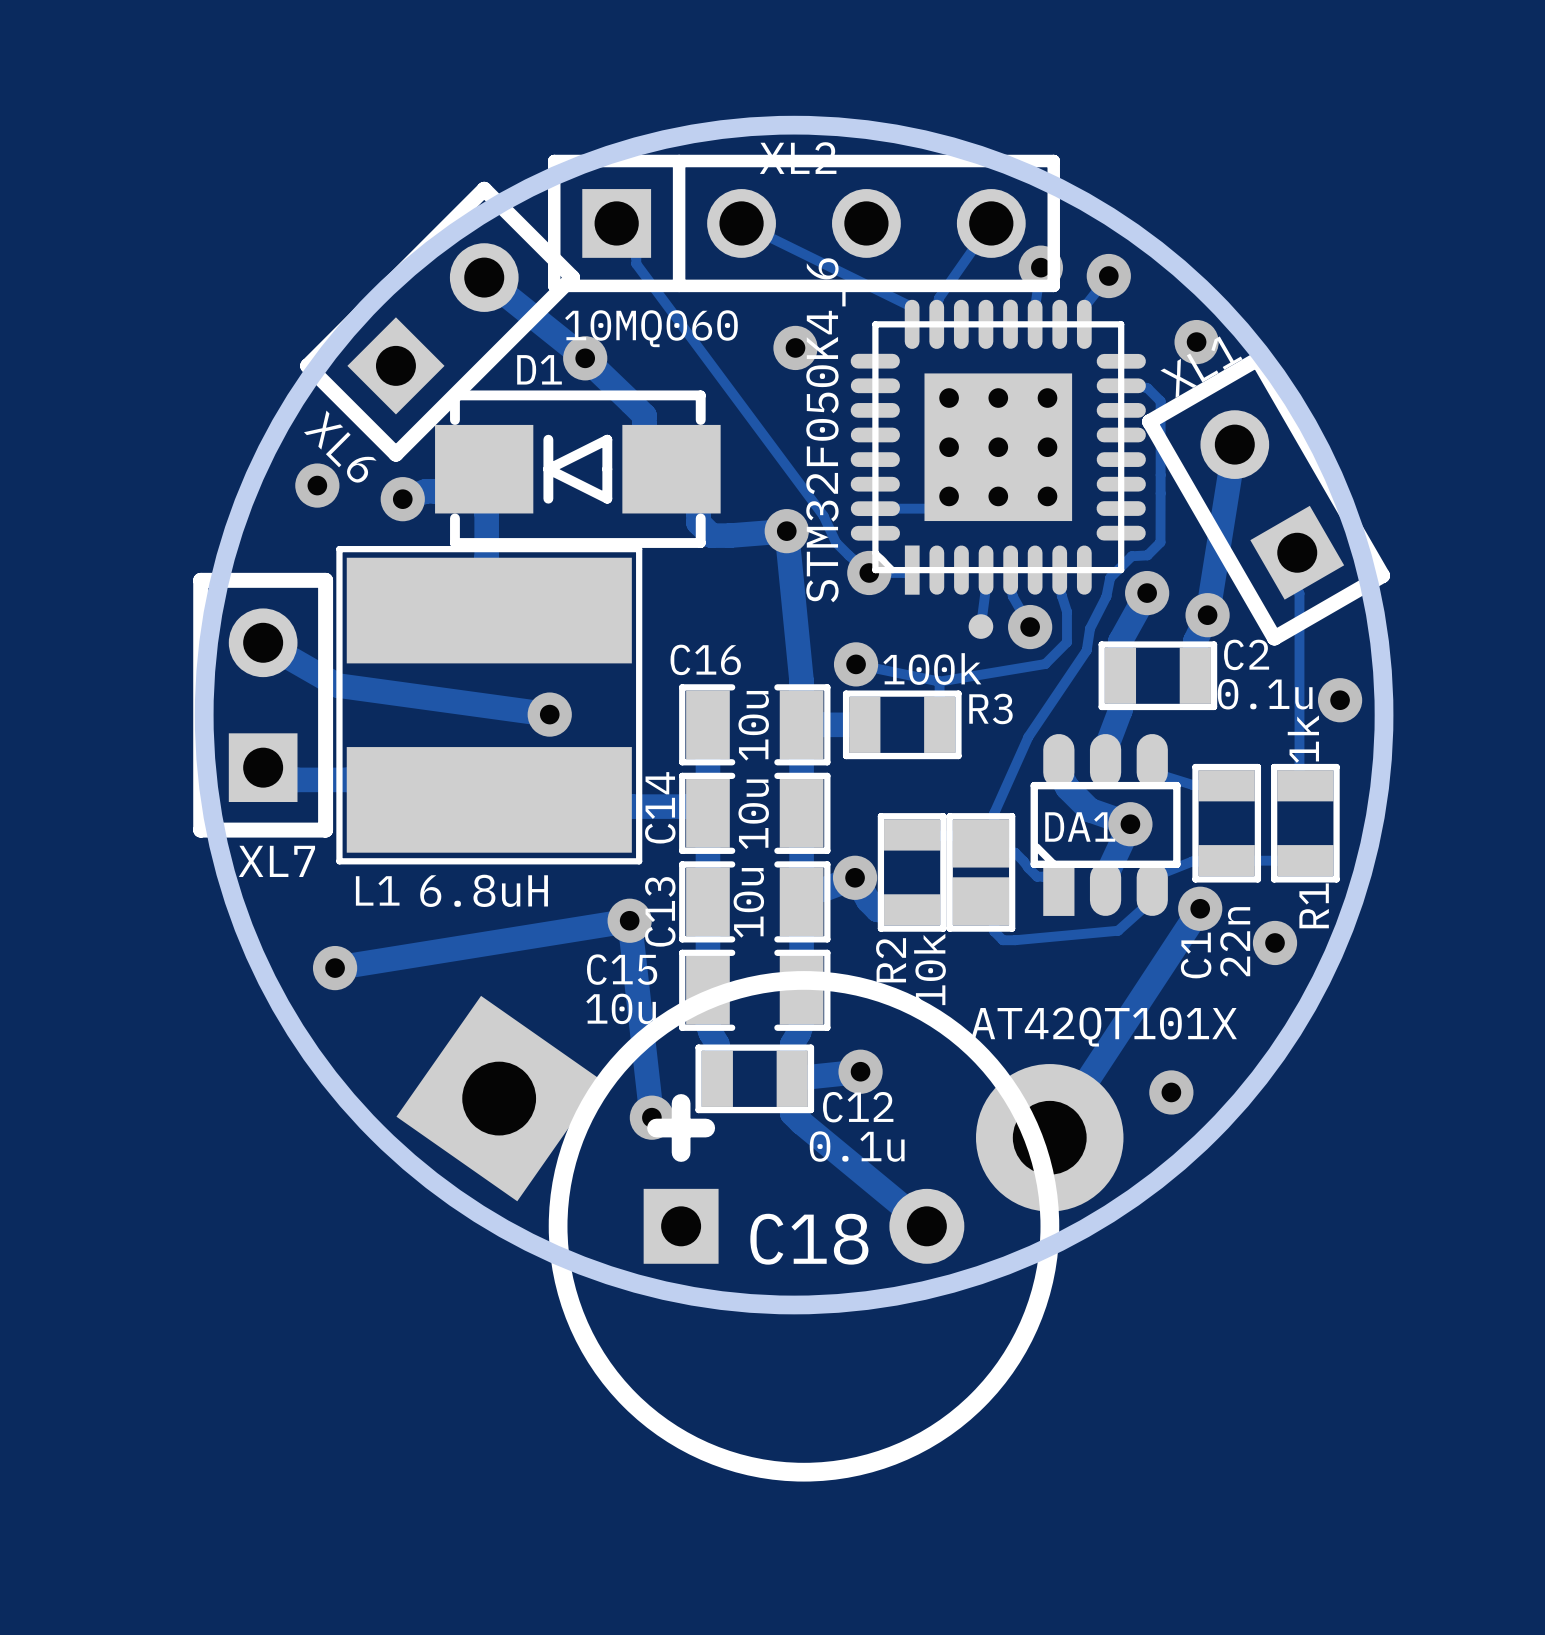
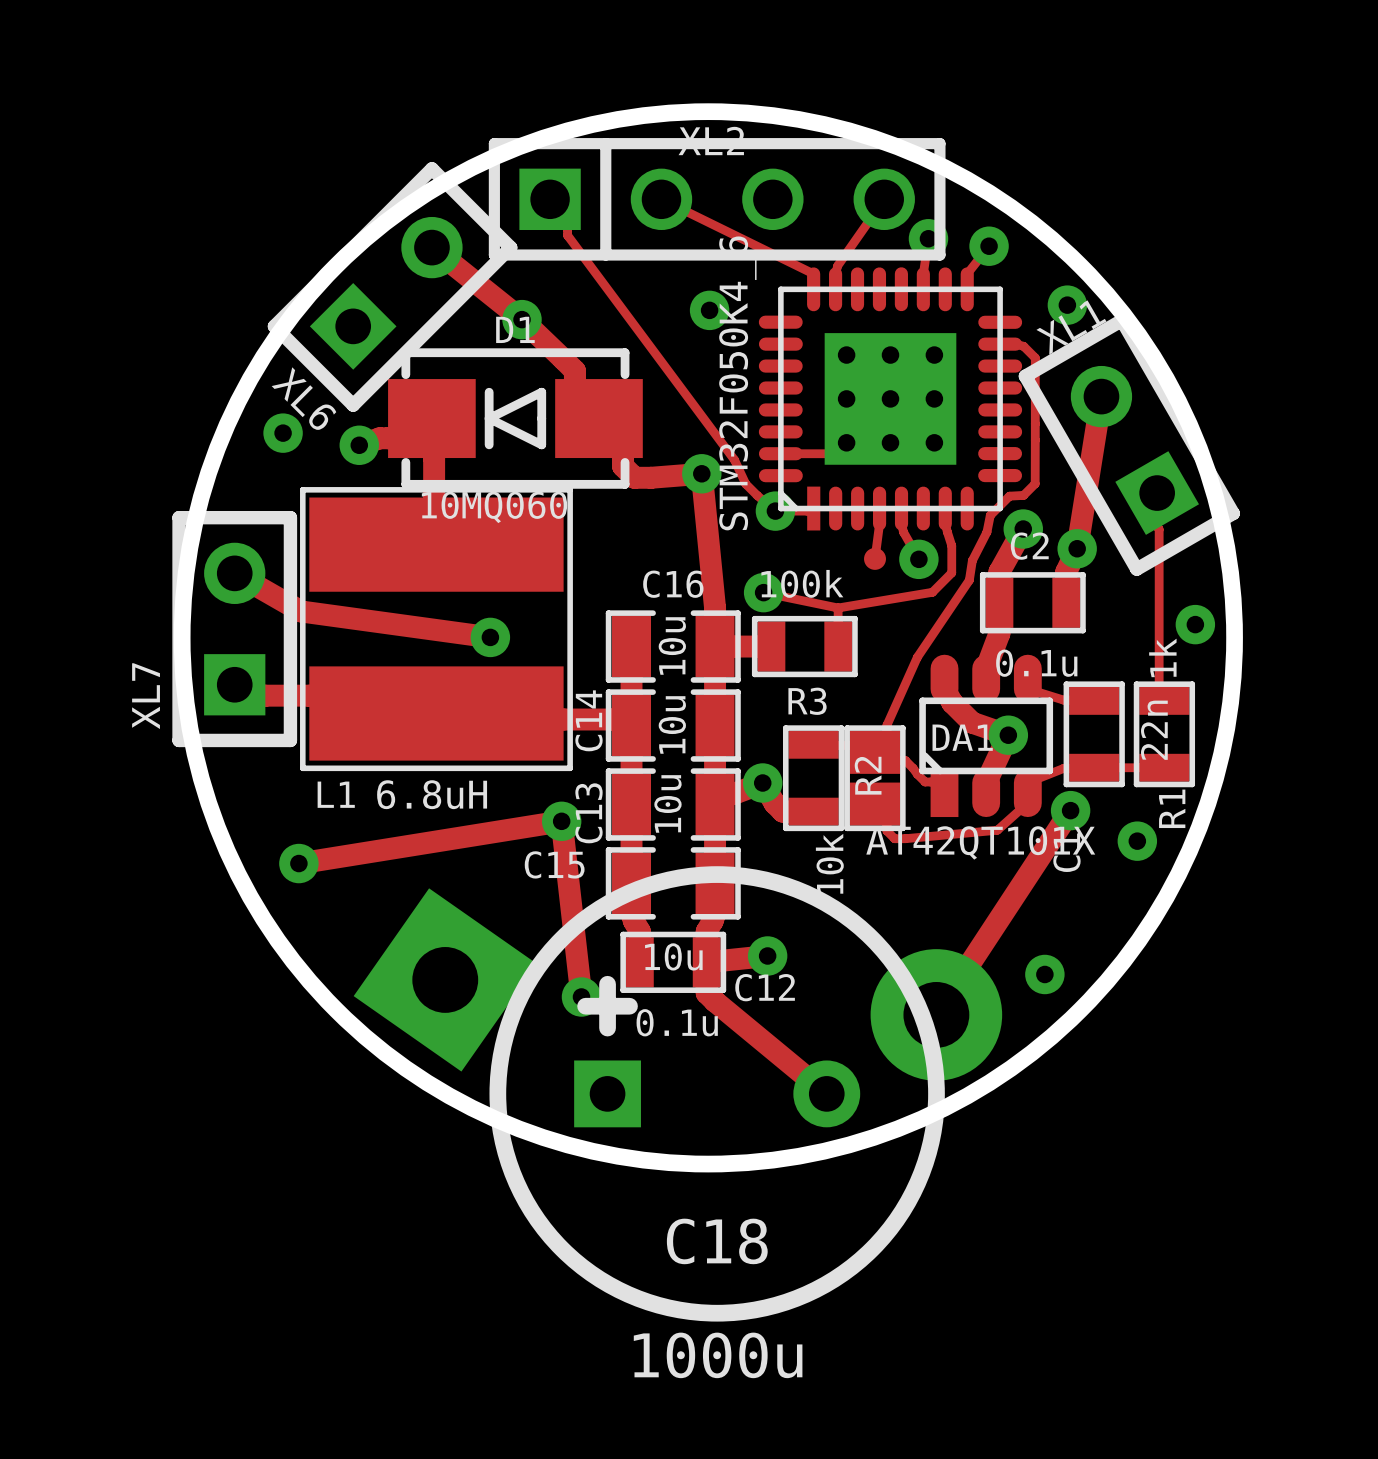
D1 value position: 10MQ060 (651, 328) -> 10MQ060 (494, 507)
D1 name position: D1 (539, 369) -> D1 (515, 329)
C2 name position: C2 (1246, 654) -> C2 (1029, 546)
C16 name position: C16 (705, 659) -> C16 (673, 584)
R3 value position: 100k (932, 669) -> 100k (802, 583)
C2 value position: 0.1u (1265, 694) -> 0.1u (1036, 663)
R3 name position: R3 (990, 708) -> R3 (807, 701)
XL7 name rotation: 0° (276, 861) -> 90° counterclockwise (146, 696)
XL7 name position: XL7 (276, 861) -> XL7 (146, 696)
C1 value position: 22n (1235, 941) -> 22n (1154, 730)
R2 name position: R2 (891, 960) -> R2 (868, 775)
C15 value position: 10u (621, 1008) -> 10u (673, 956)
DA1 value position: AT42QT101X (1103, 1027) -> AT42QT101X (980, 842)
C12 value position: 0.1u (857, 1146) -> 0.1u (677, 1022)
C18 name position: C18 (809, 1239) -> C18 (717, 1241)
C18 value: none -> 1000u (718, 1355)

